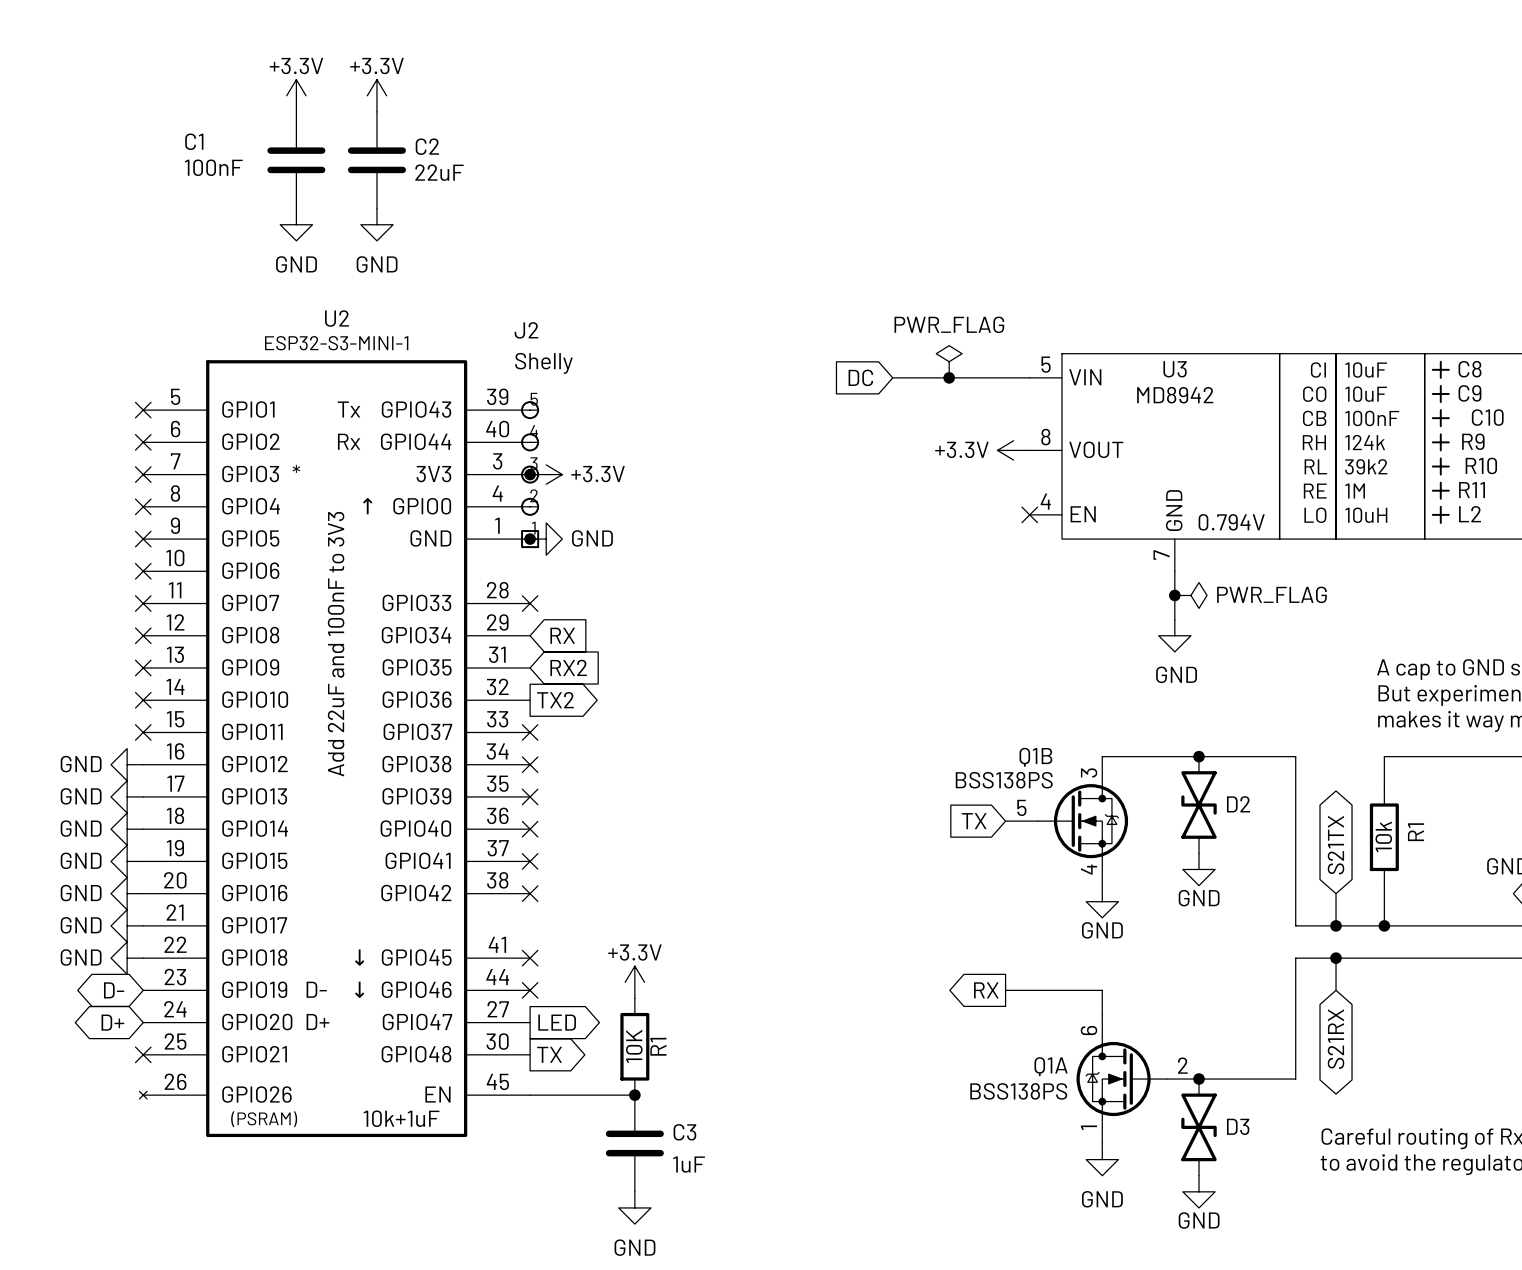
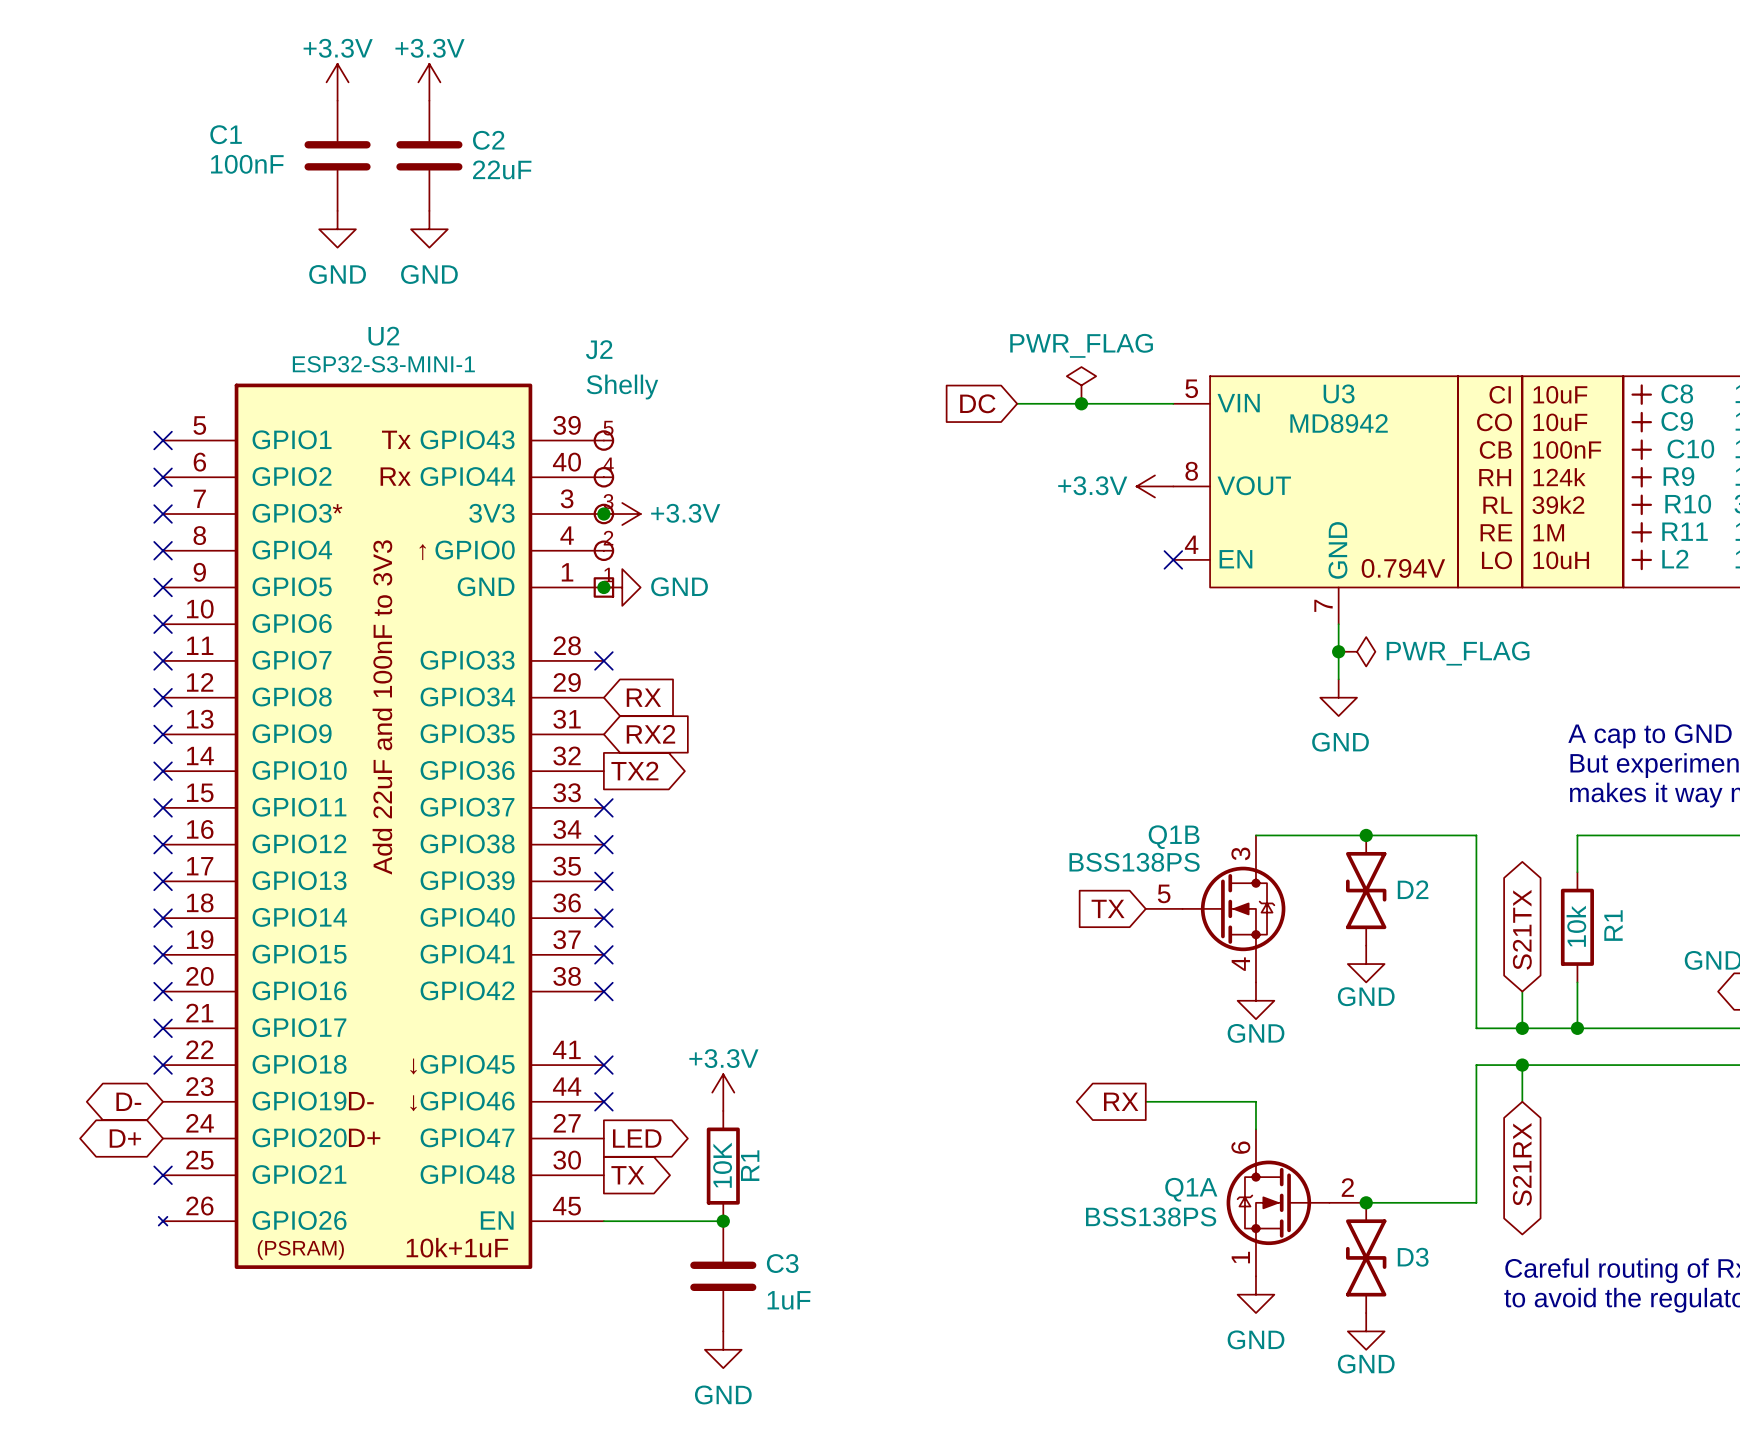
power symbol: GND (127, 764) -> none
no-connect mark: none -> (163, 844)
power symbol: GND (127, 796) -> none
no-connect mark: none -> (163, 881)
power symbol: GND (127, 829) -> none
no-connect mark: none -> (163, 918)
power symbol: GND (127, 861) -> none
no-connect mark: none -> (163, 954)
power symbol: GND (127, 893) -> none
no-connect mark: none -> (163, 991)
power symbol: GND (127, 925) -> none
no-connect mark: none -> (163, 1028)
power symbol: GND (127, 958) -> none
no-connect mark: none -> (163, 1065)

